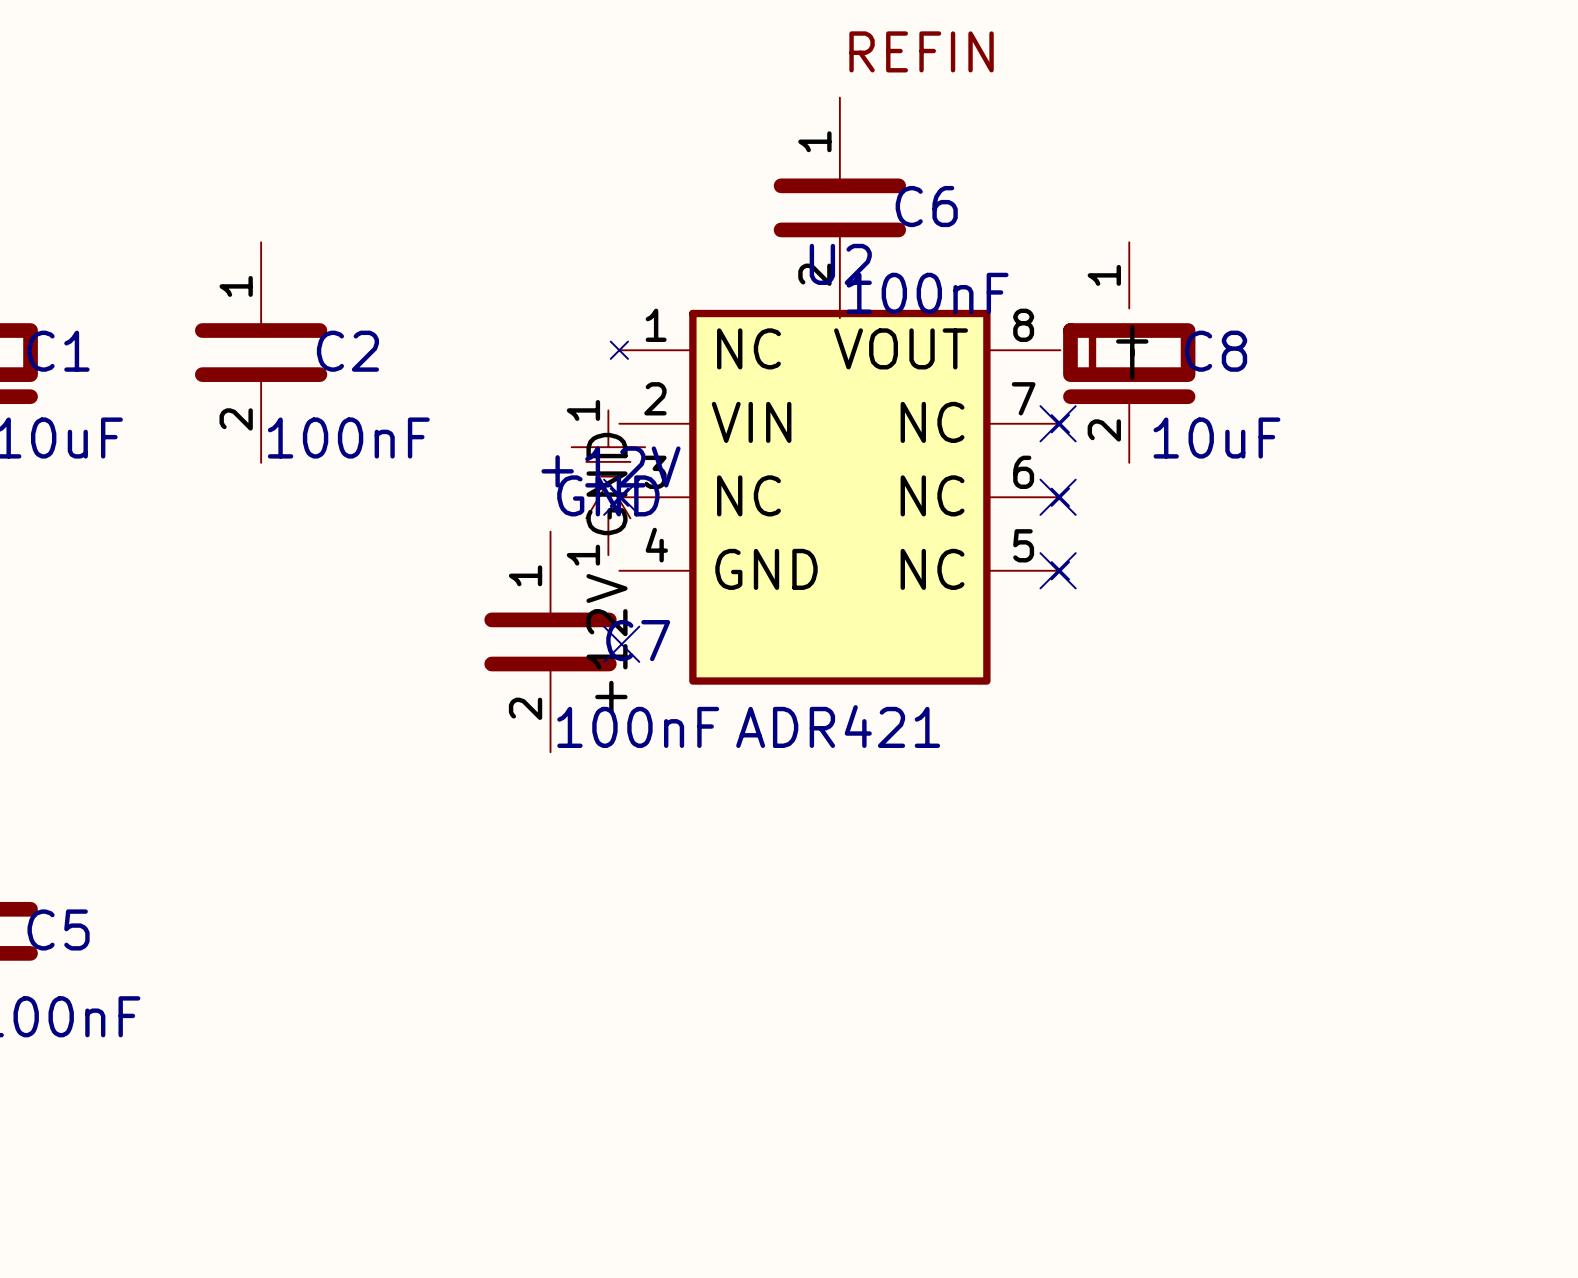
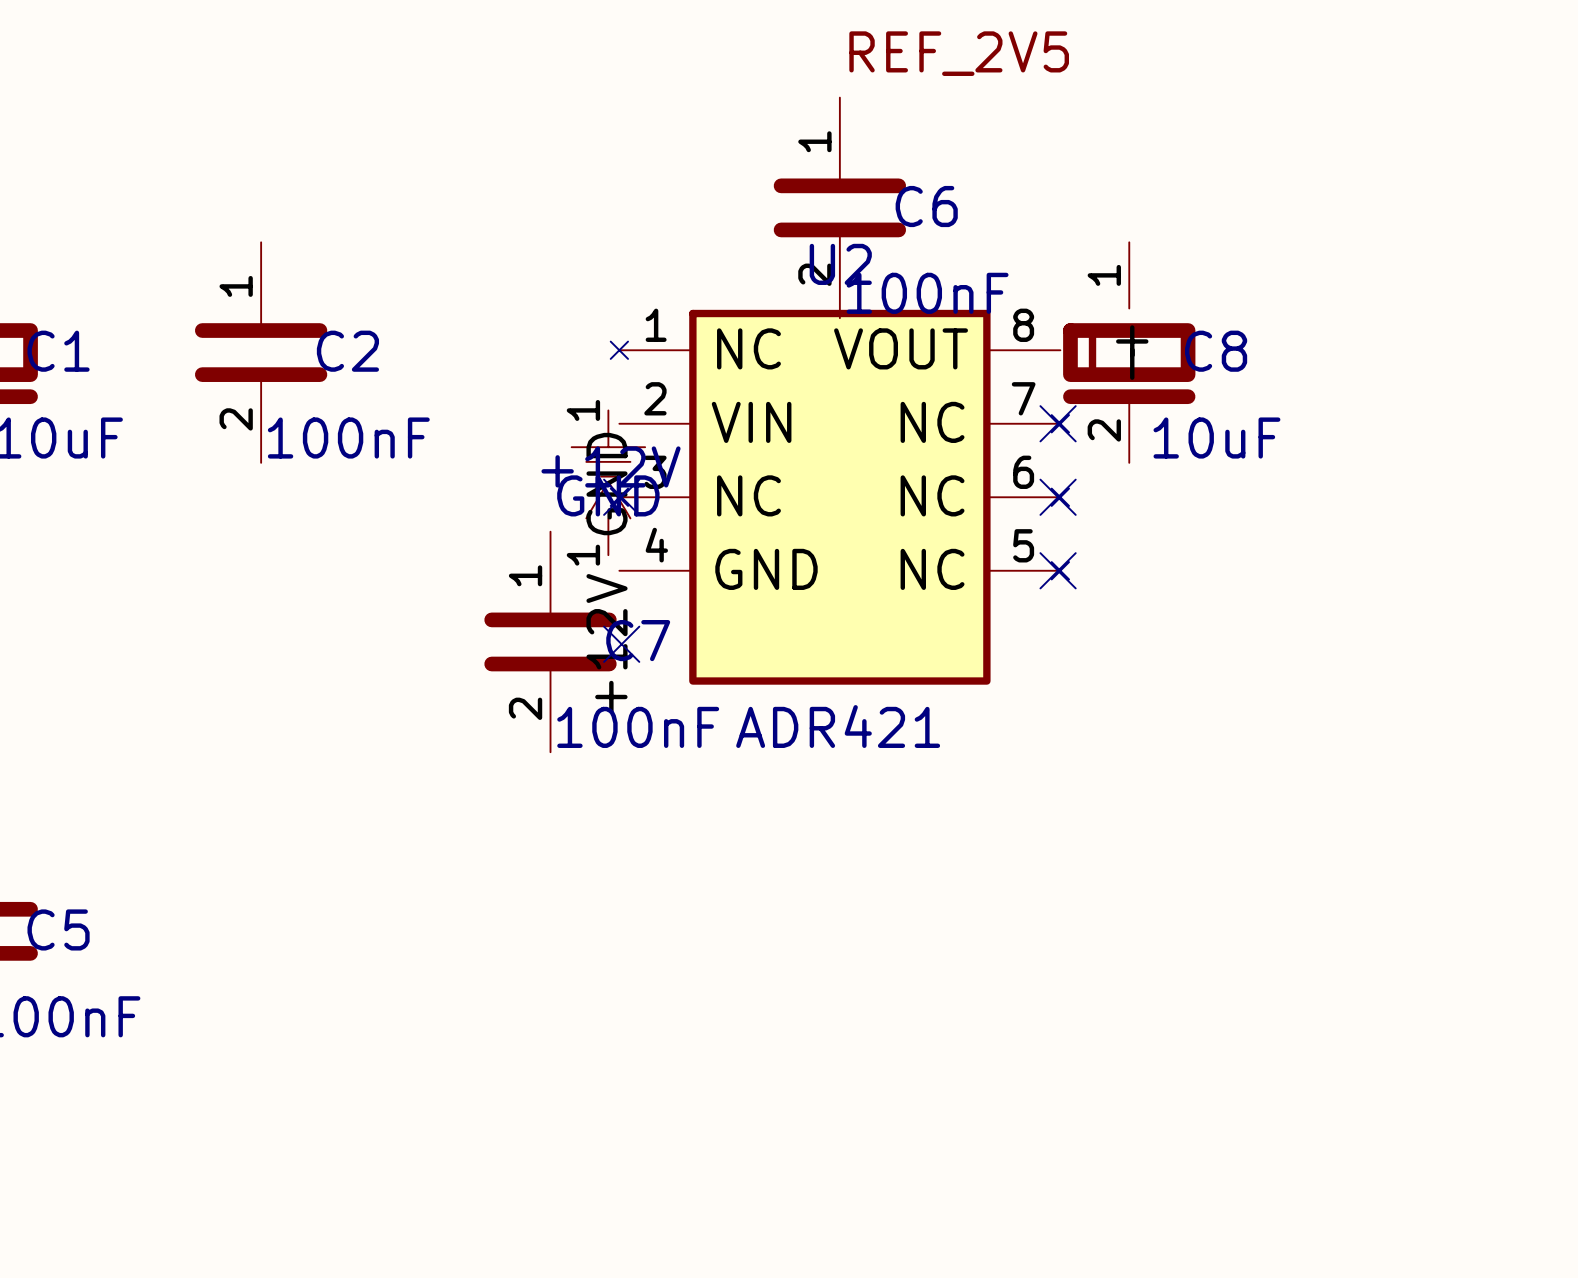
label: REFIN (921, 51) -> REF_2V5 (959, 53)

